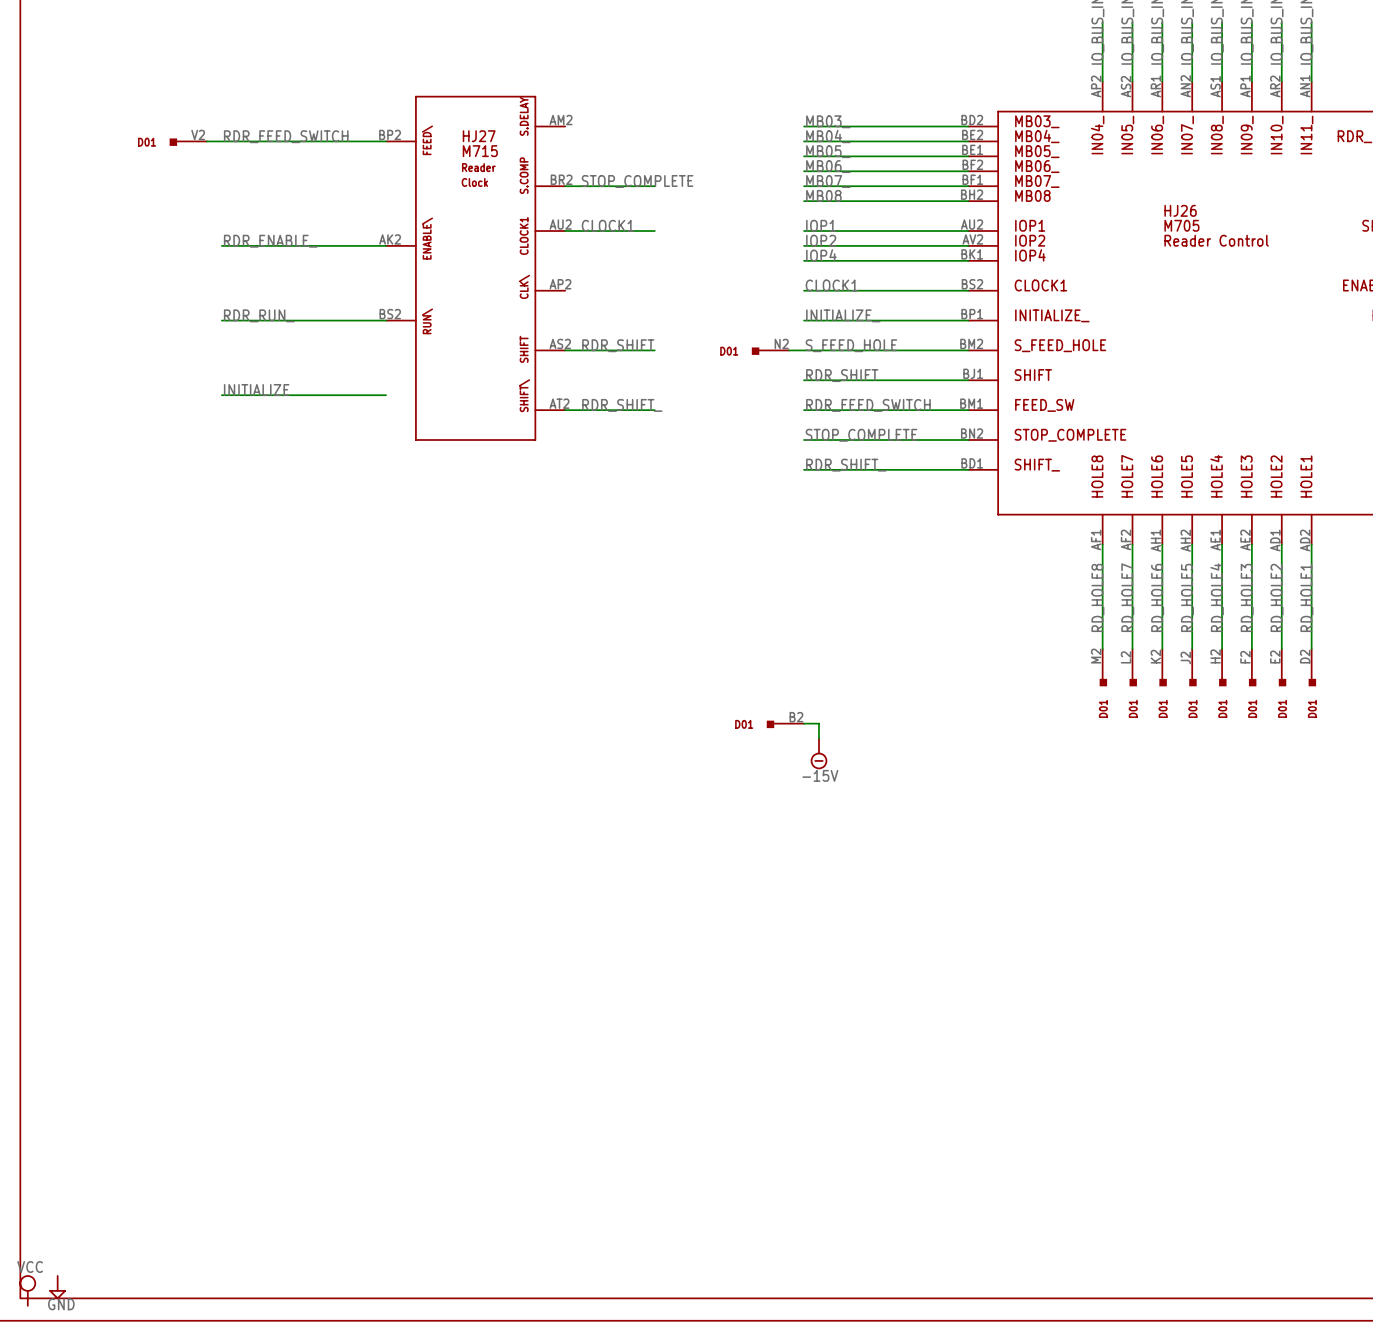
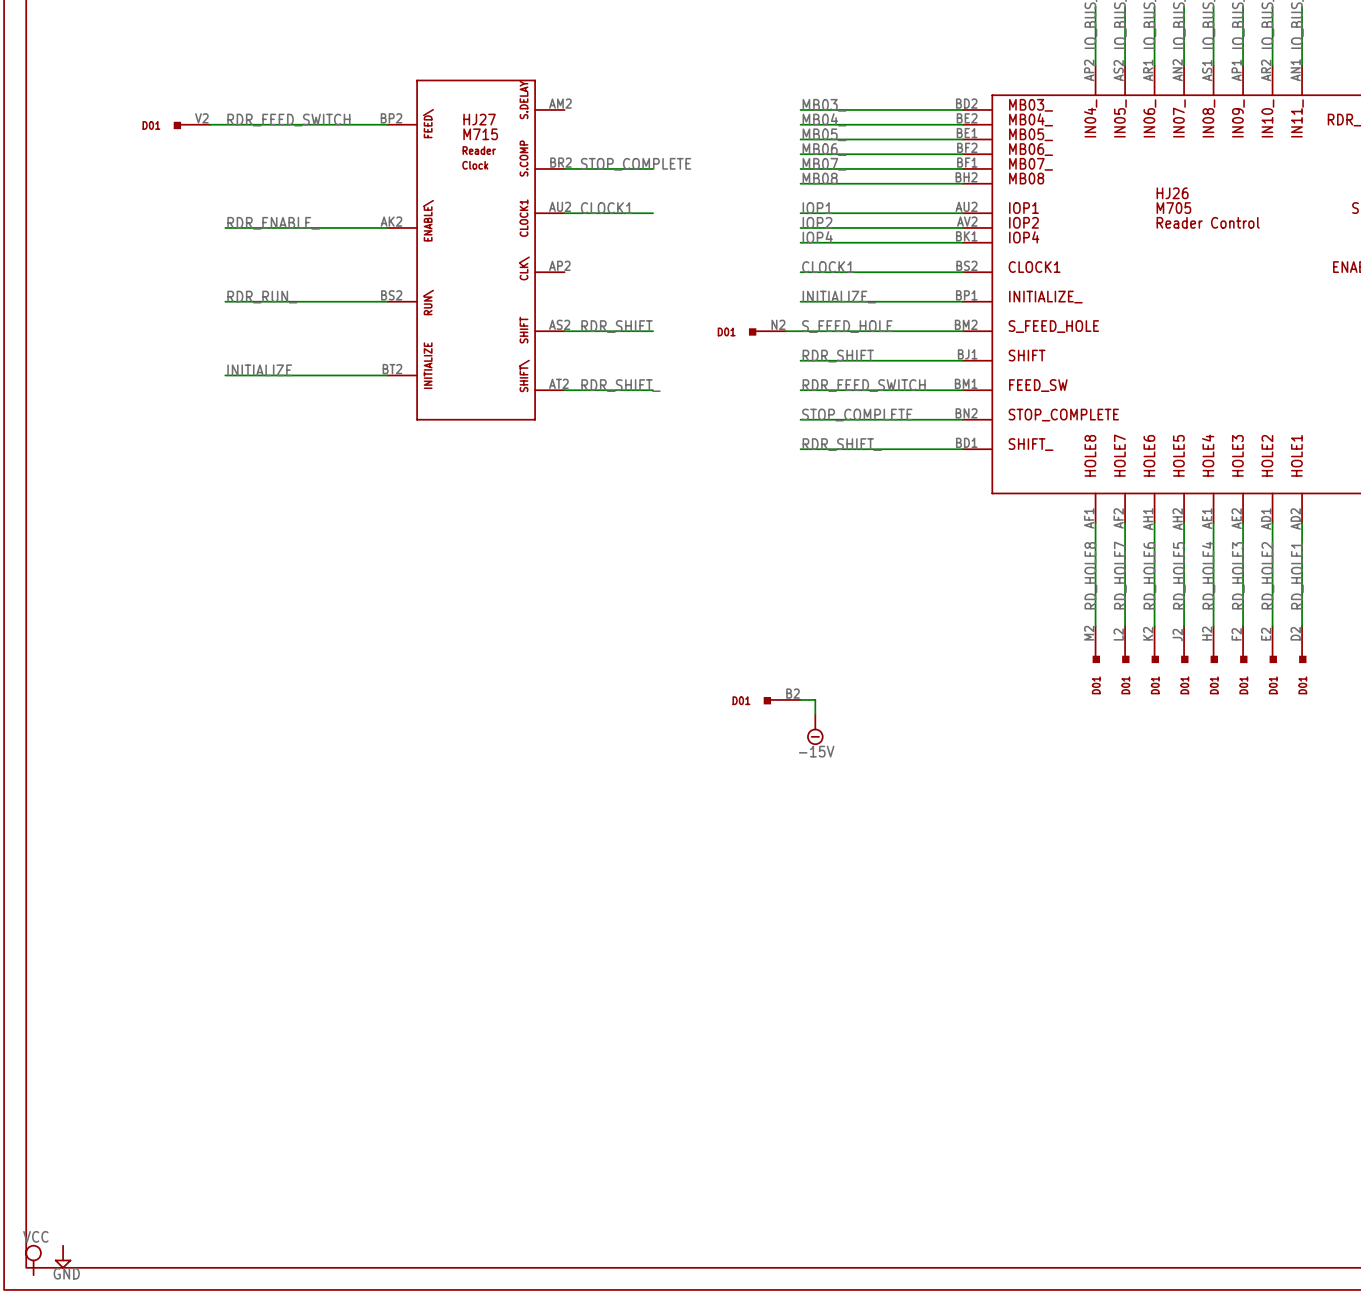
HJ27 symbol: [386, 95, 566, 441] -> [387, 79, 565, 421]

